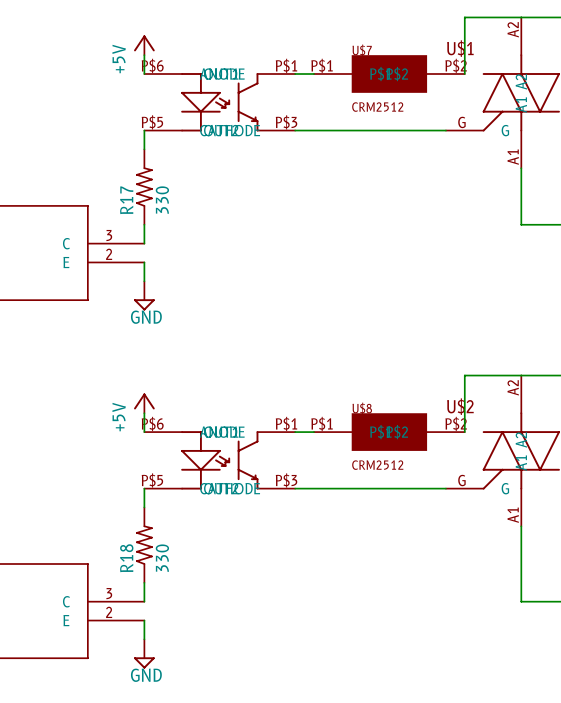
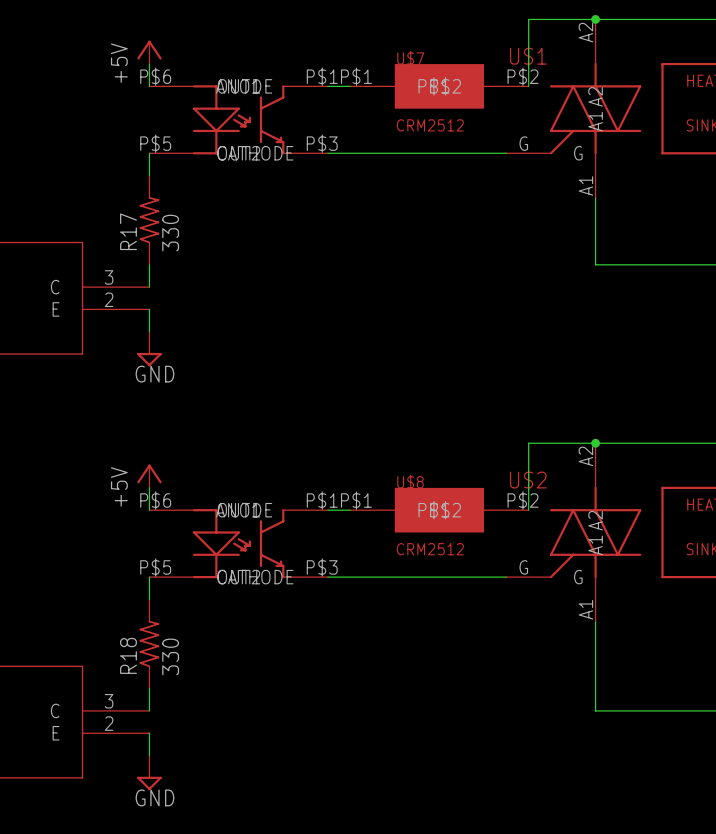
junction: none -> (595, 19)
junction: none -> (595, 443)

